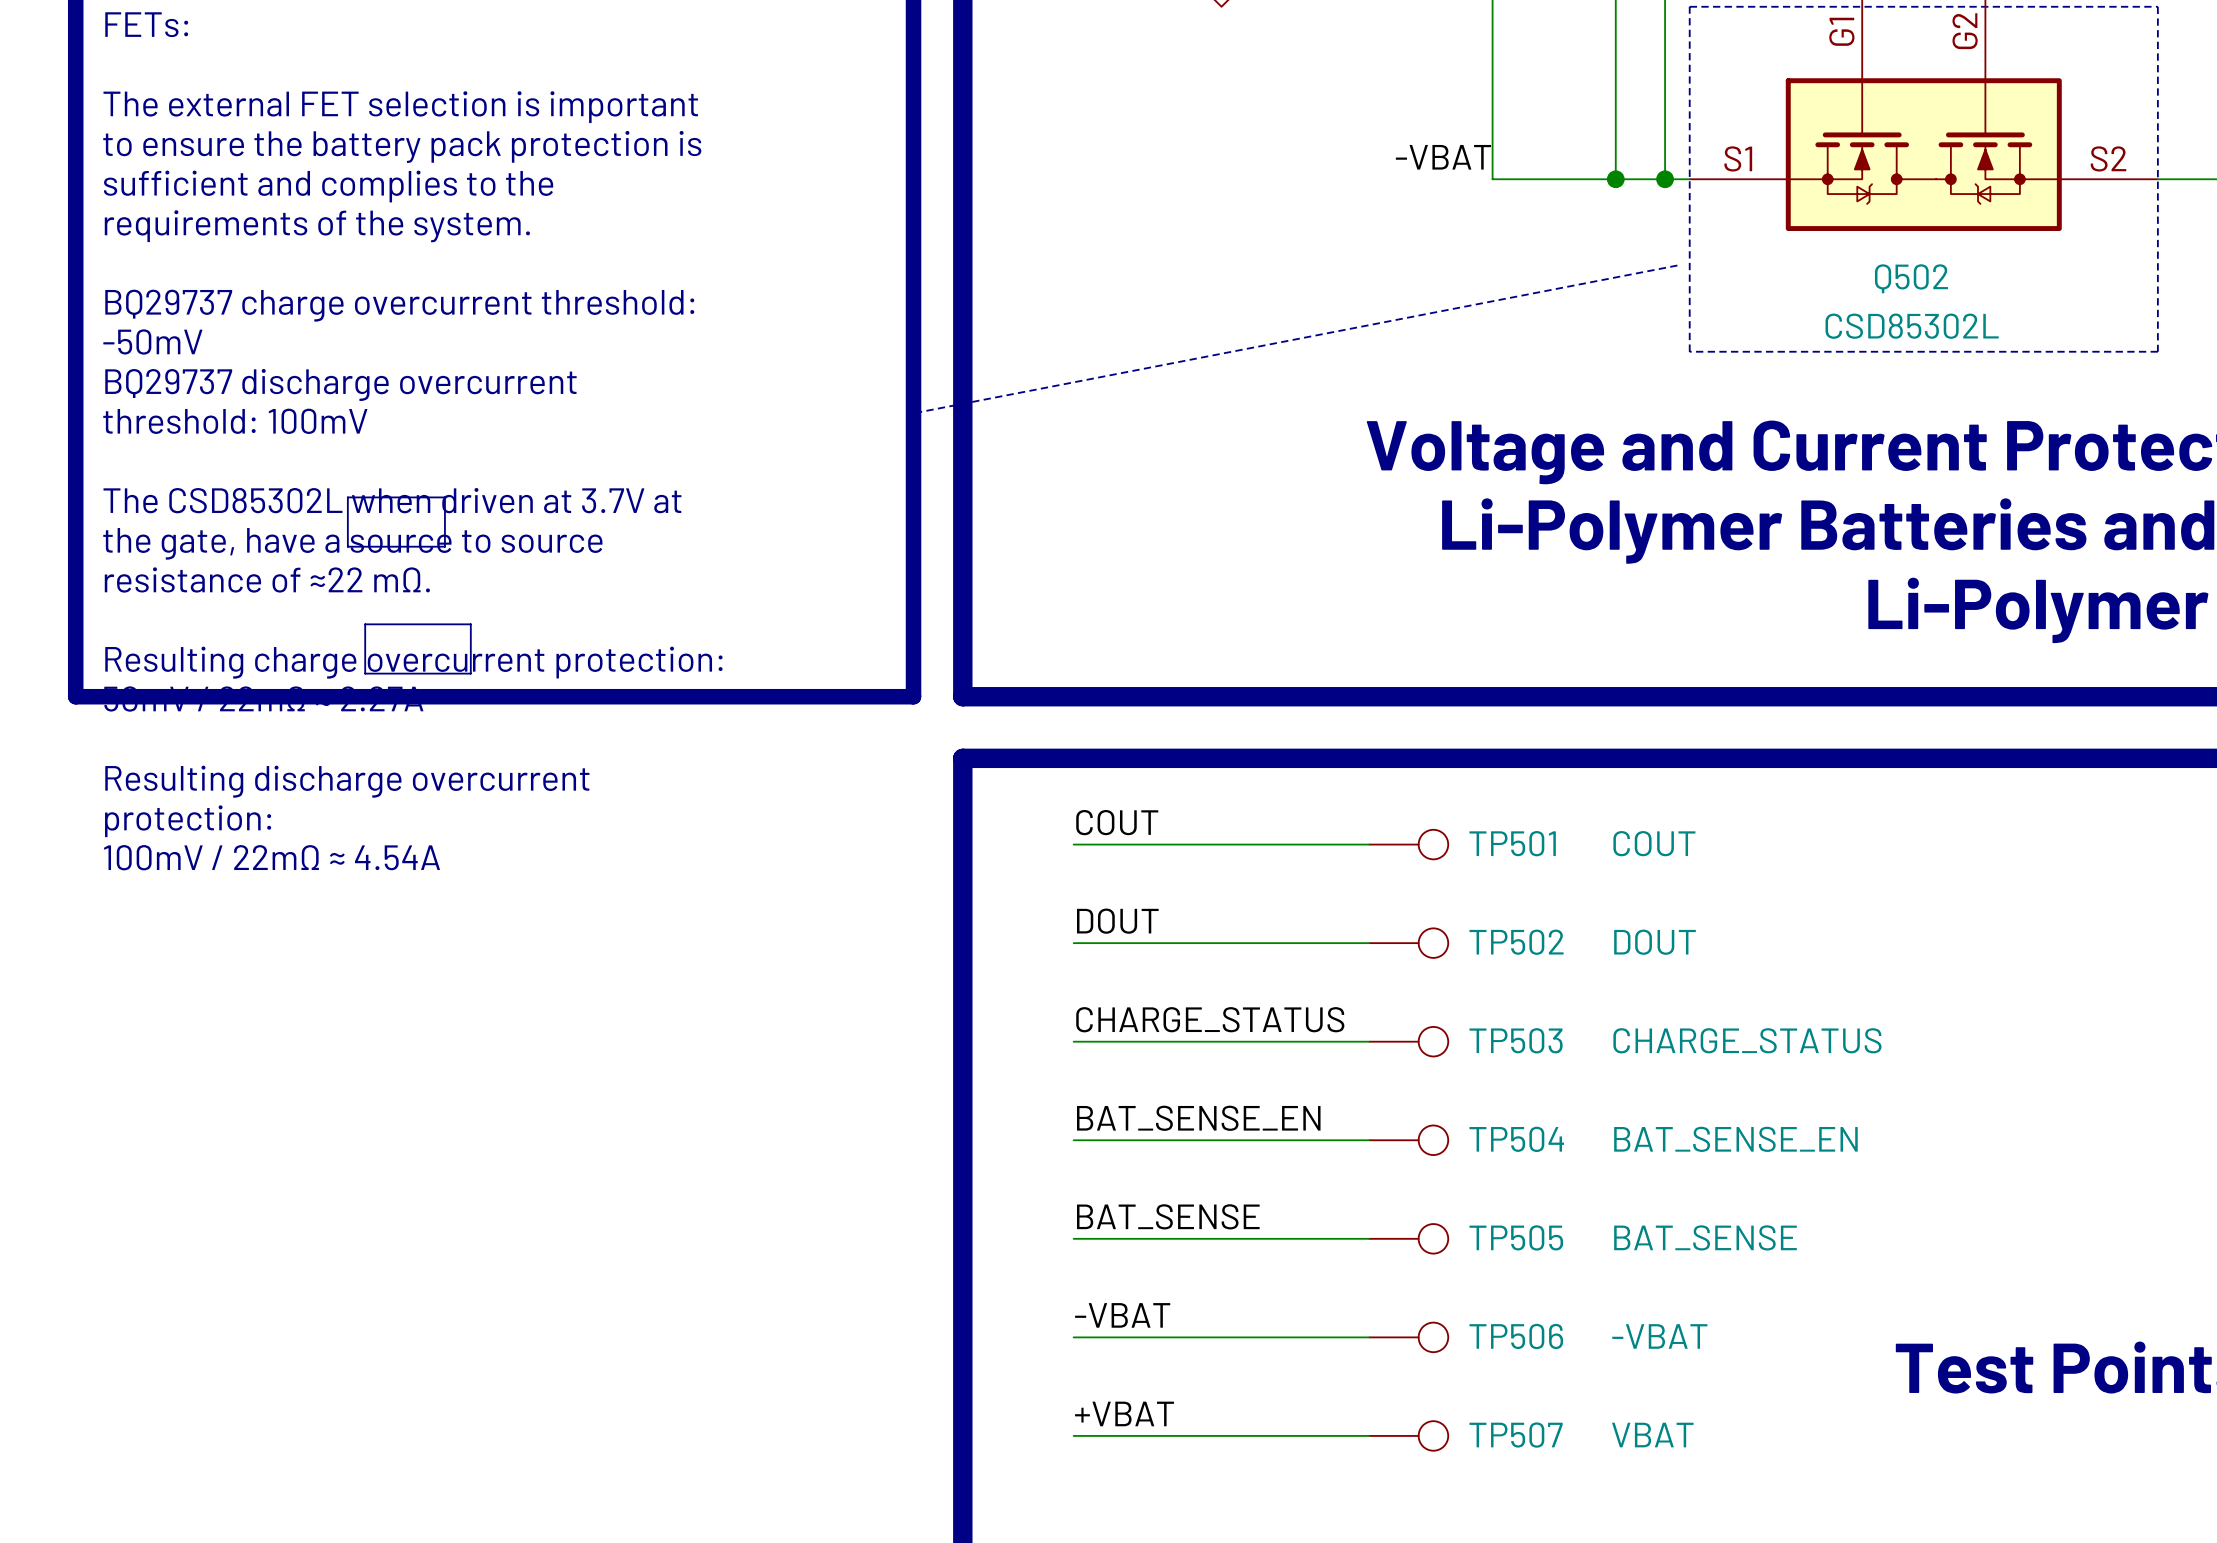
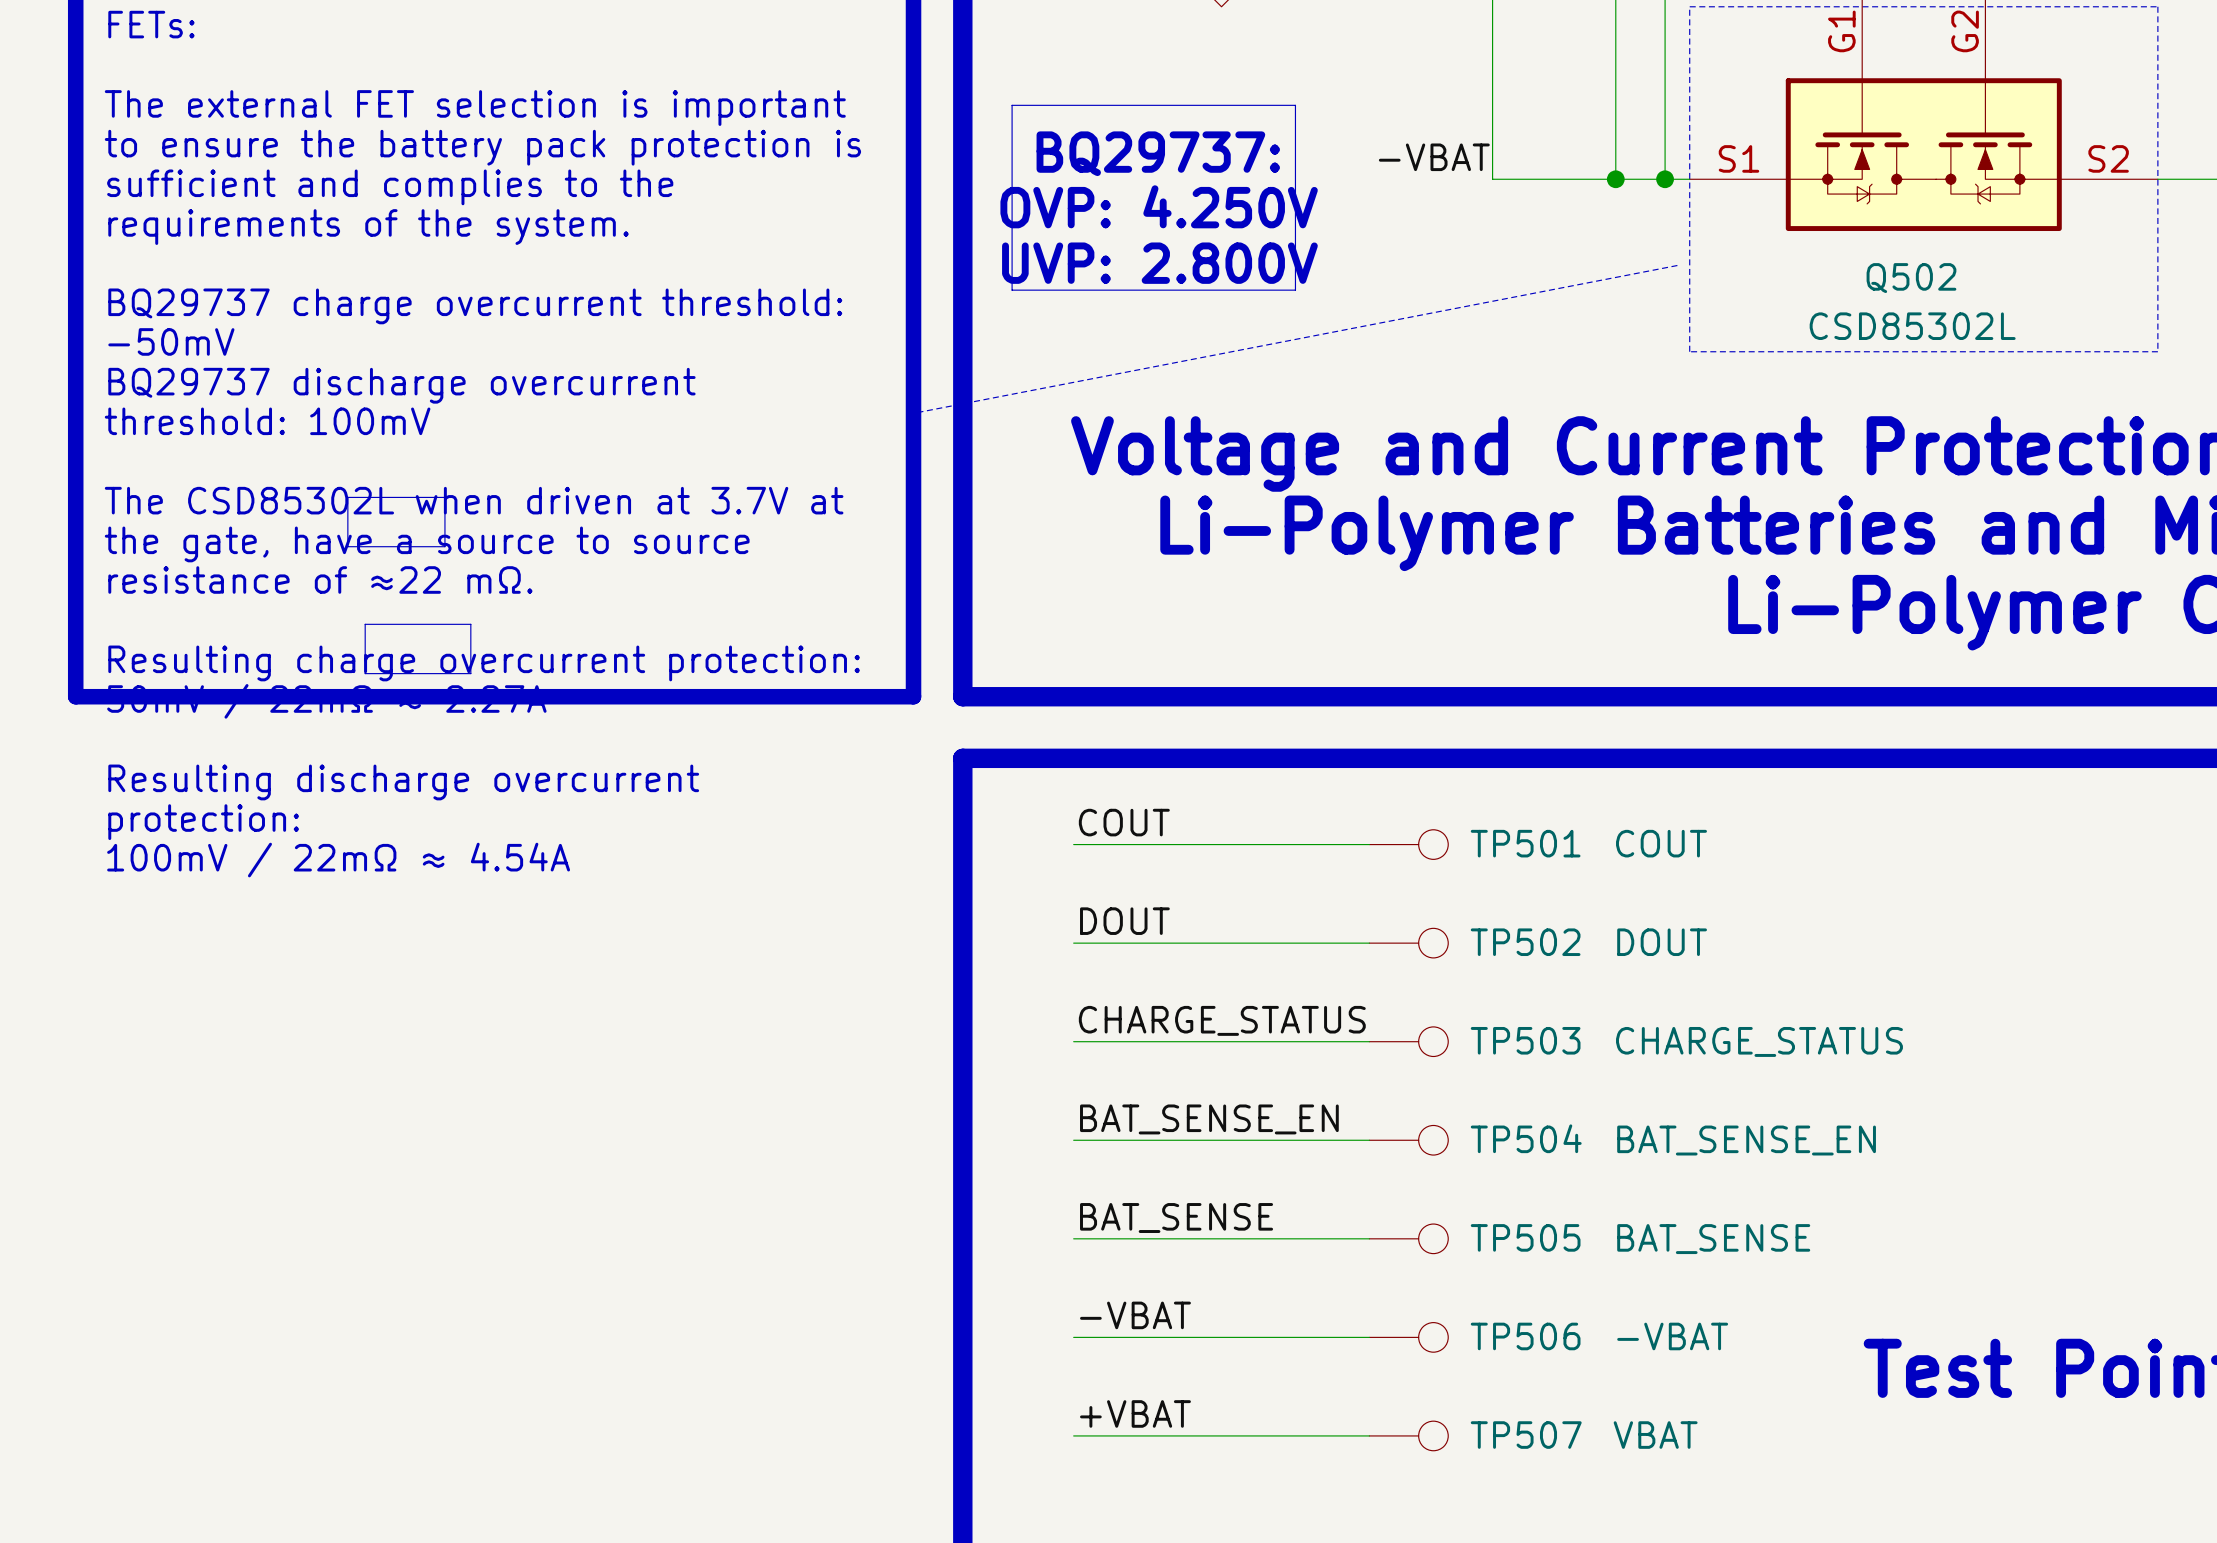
line: none -> (1012, 105) (1295, 105) (1295, 290) (1012, 290) (1012, 105)
text: none -> BQ29737: (1158, 153)
text: none -> OVP: 4.250V (1159, 206)
text: none -> UVP: 2.800V (1159, 263)

